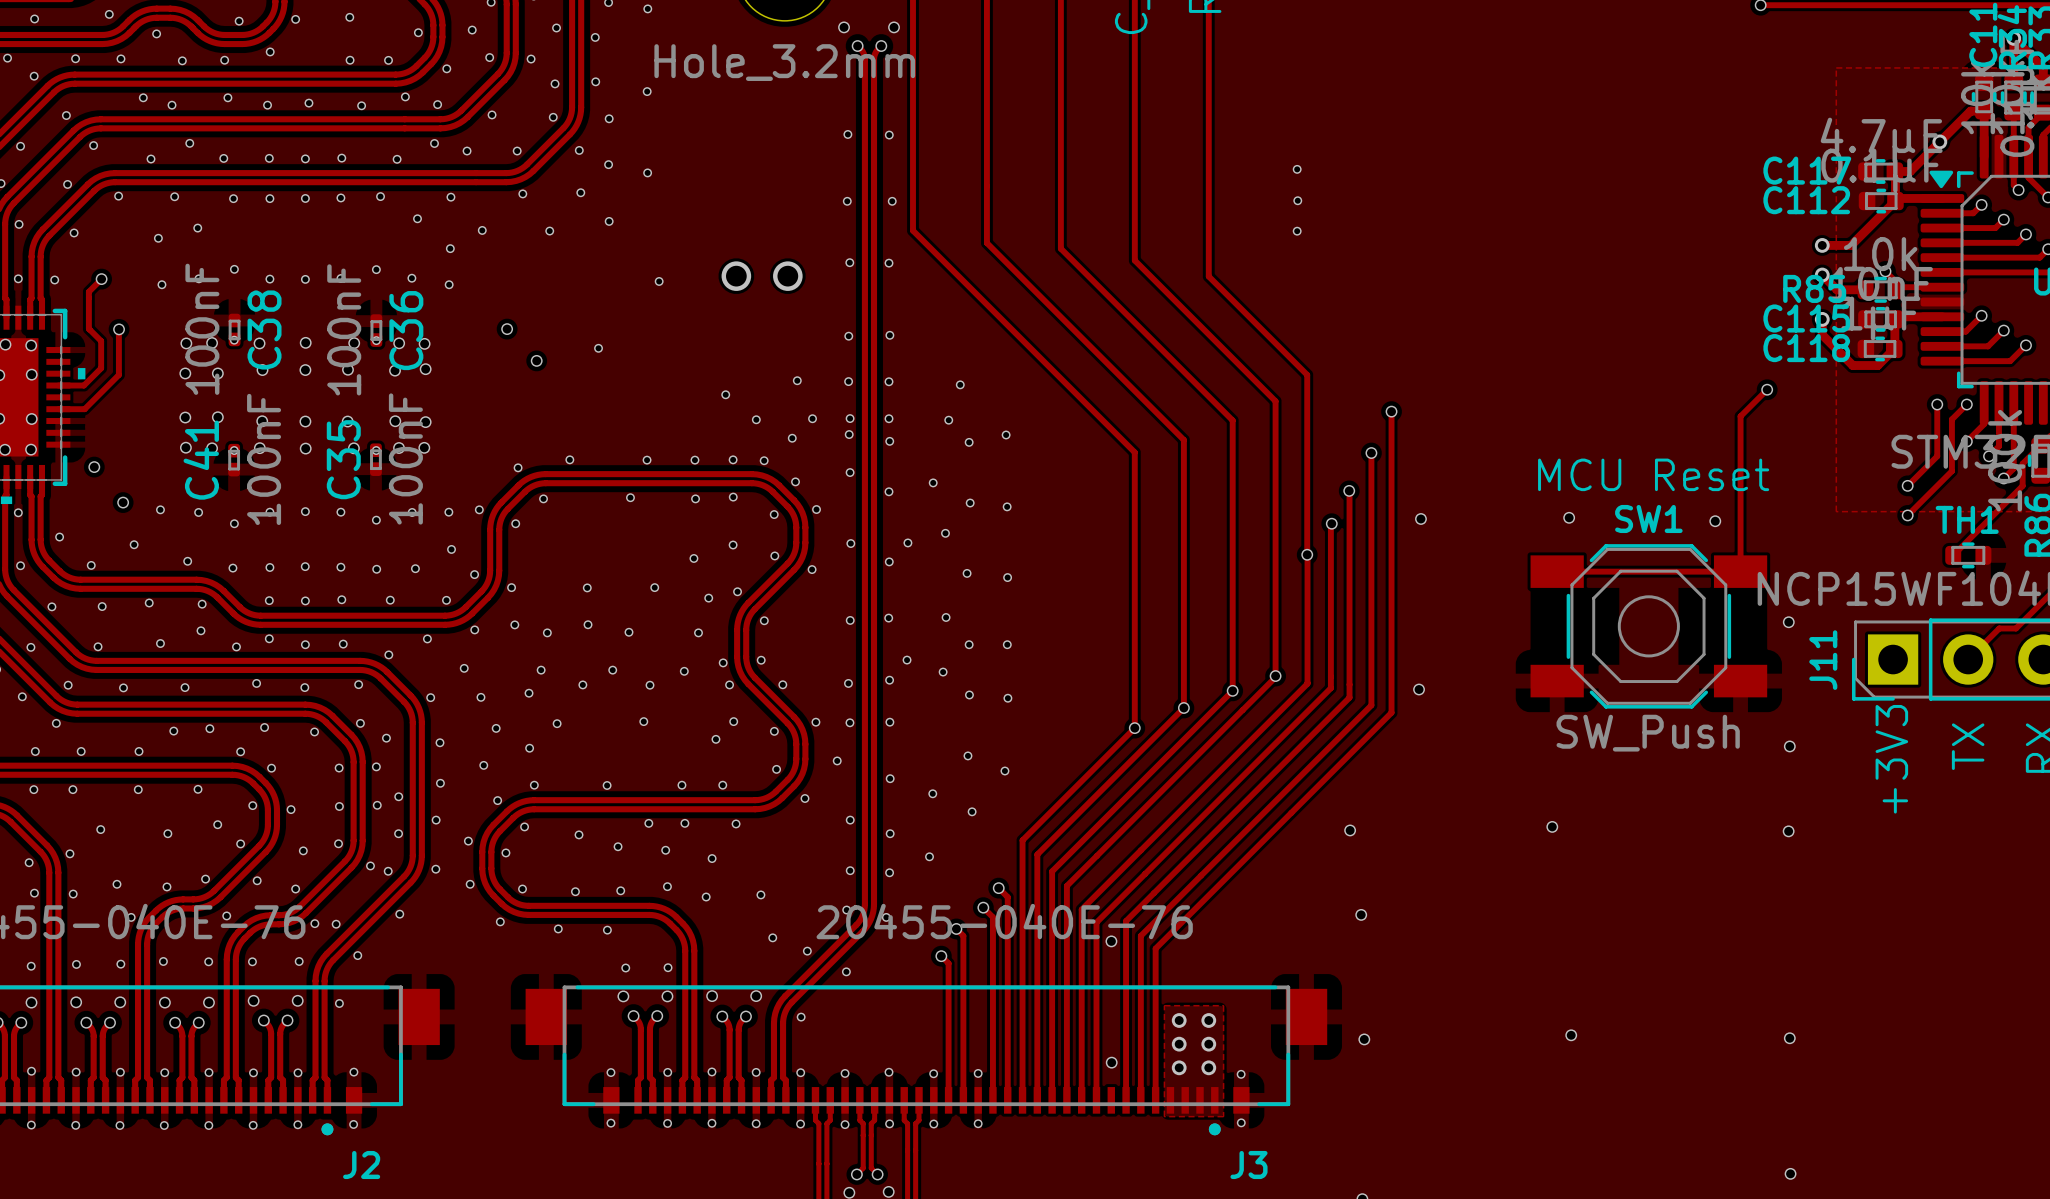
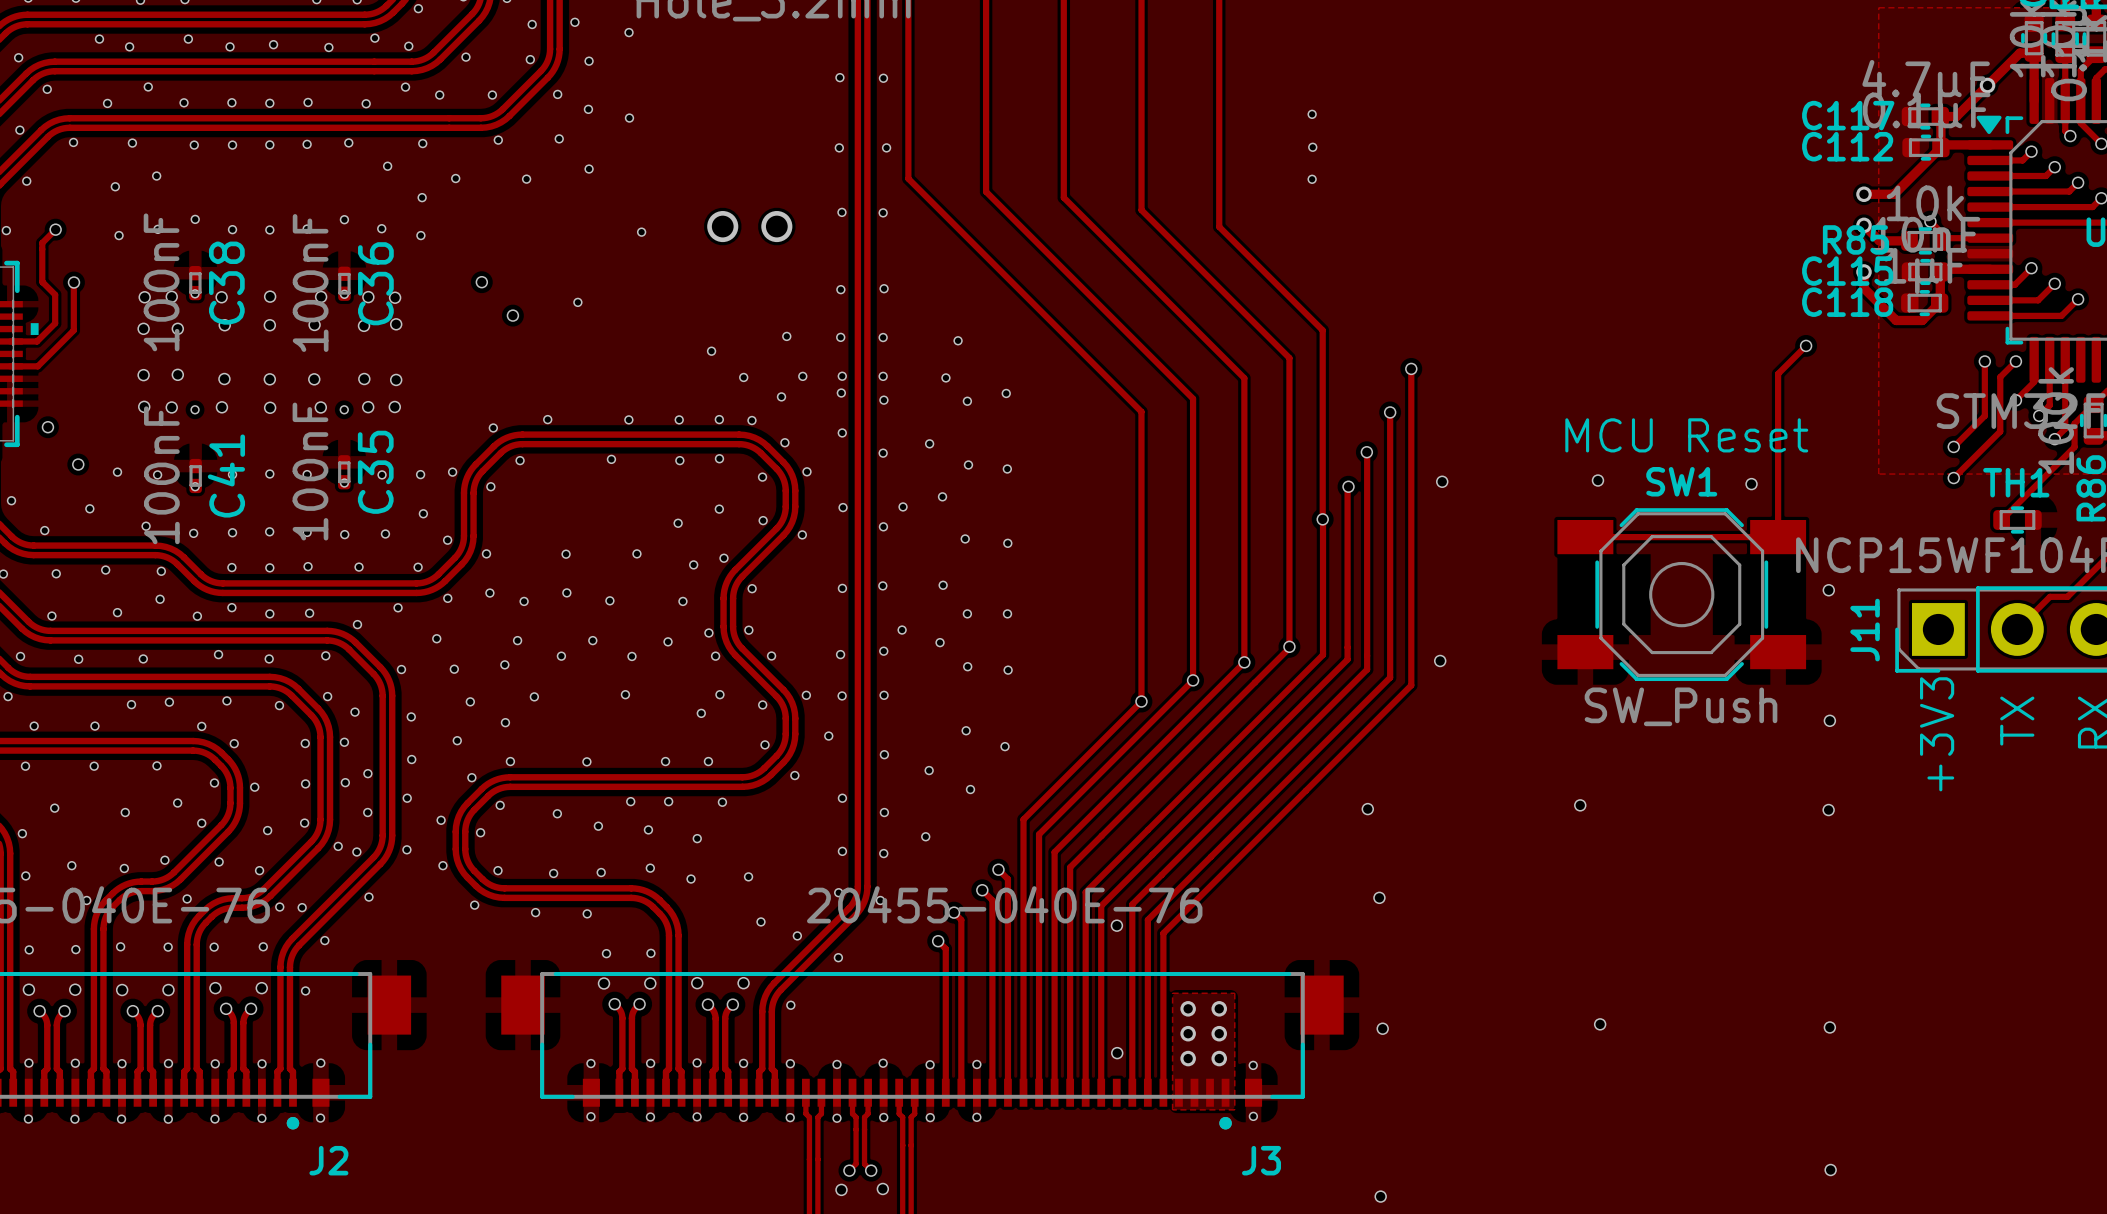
C35 value position: 100nF (405, 458) -> 100nF (310, 471)
C41 value position: 100nF (264, 459) -> 100nF (161, 475)
C35 name position: C35 (343, 459) -> C35 (375, 472)
C35 position: (375, 459) -> (344, 472)
C41 name position: C41 (201, 460) -> C41 (226, 476)
C41 position: (234, 460) -> (195, 476)

